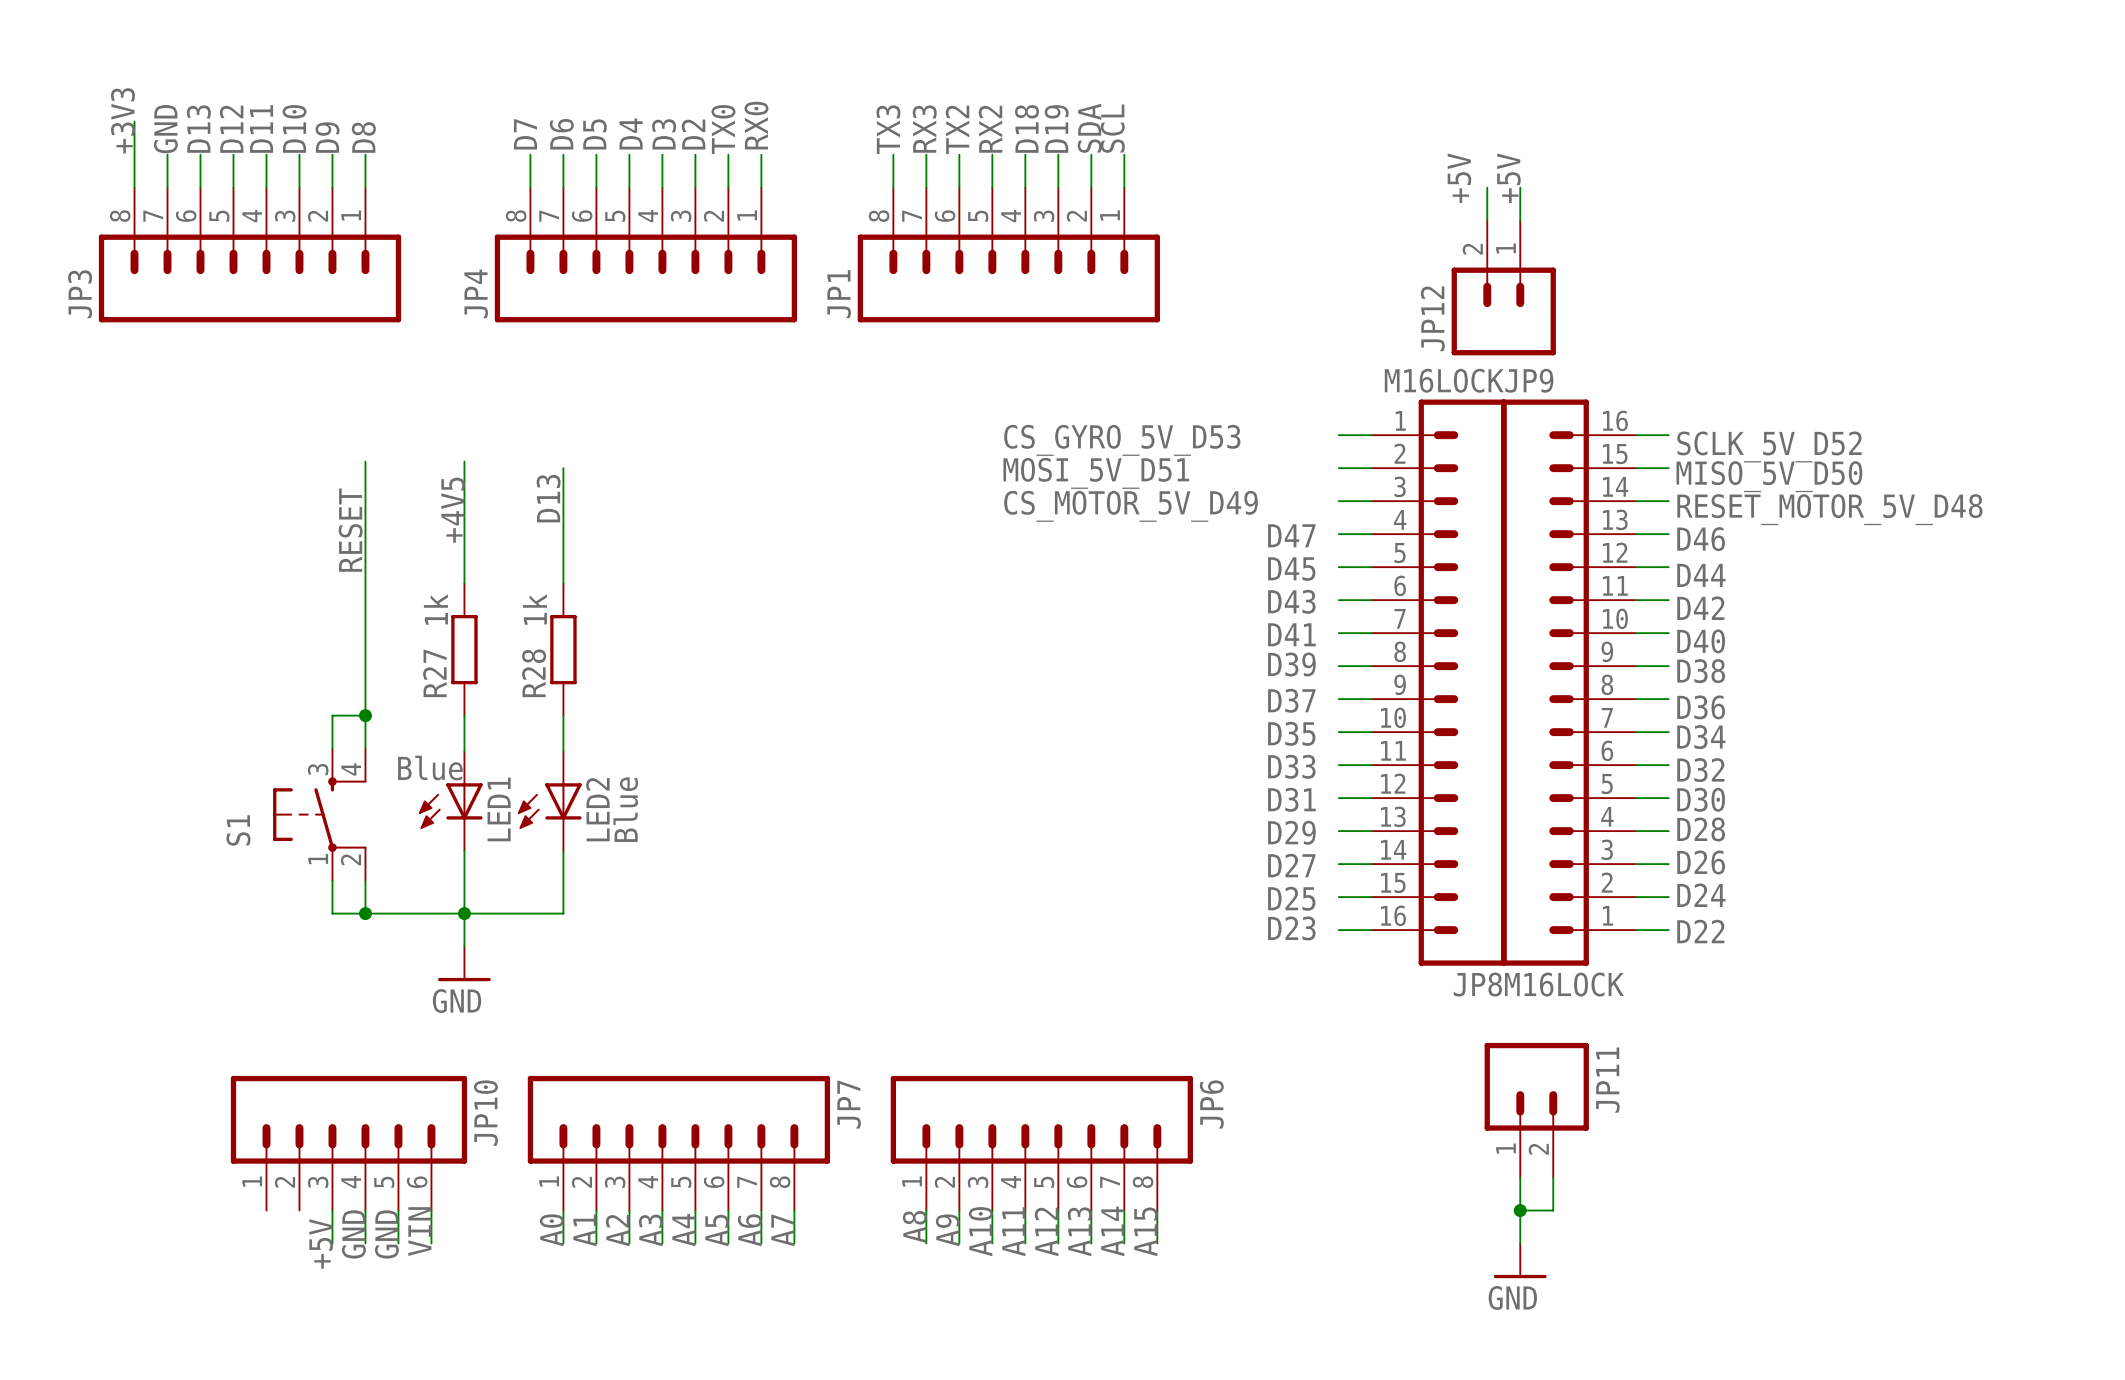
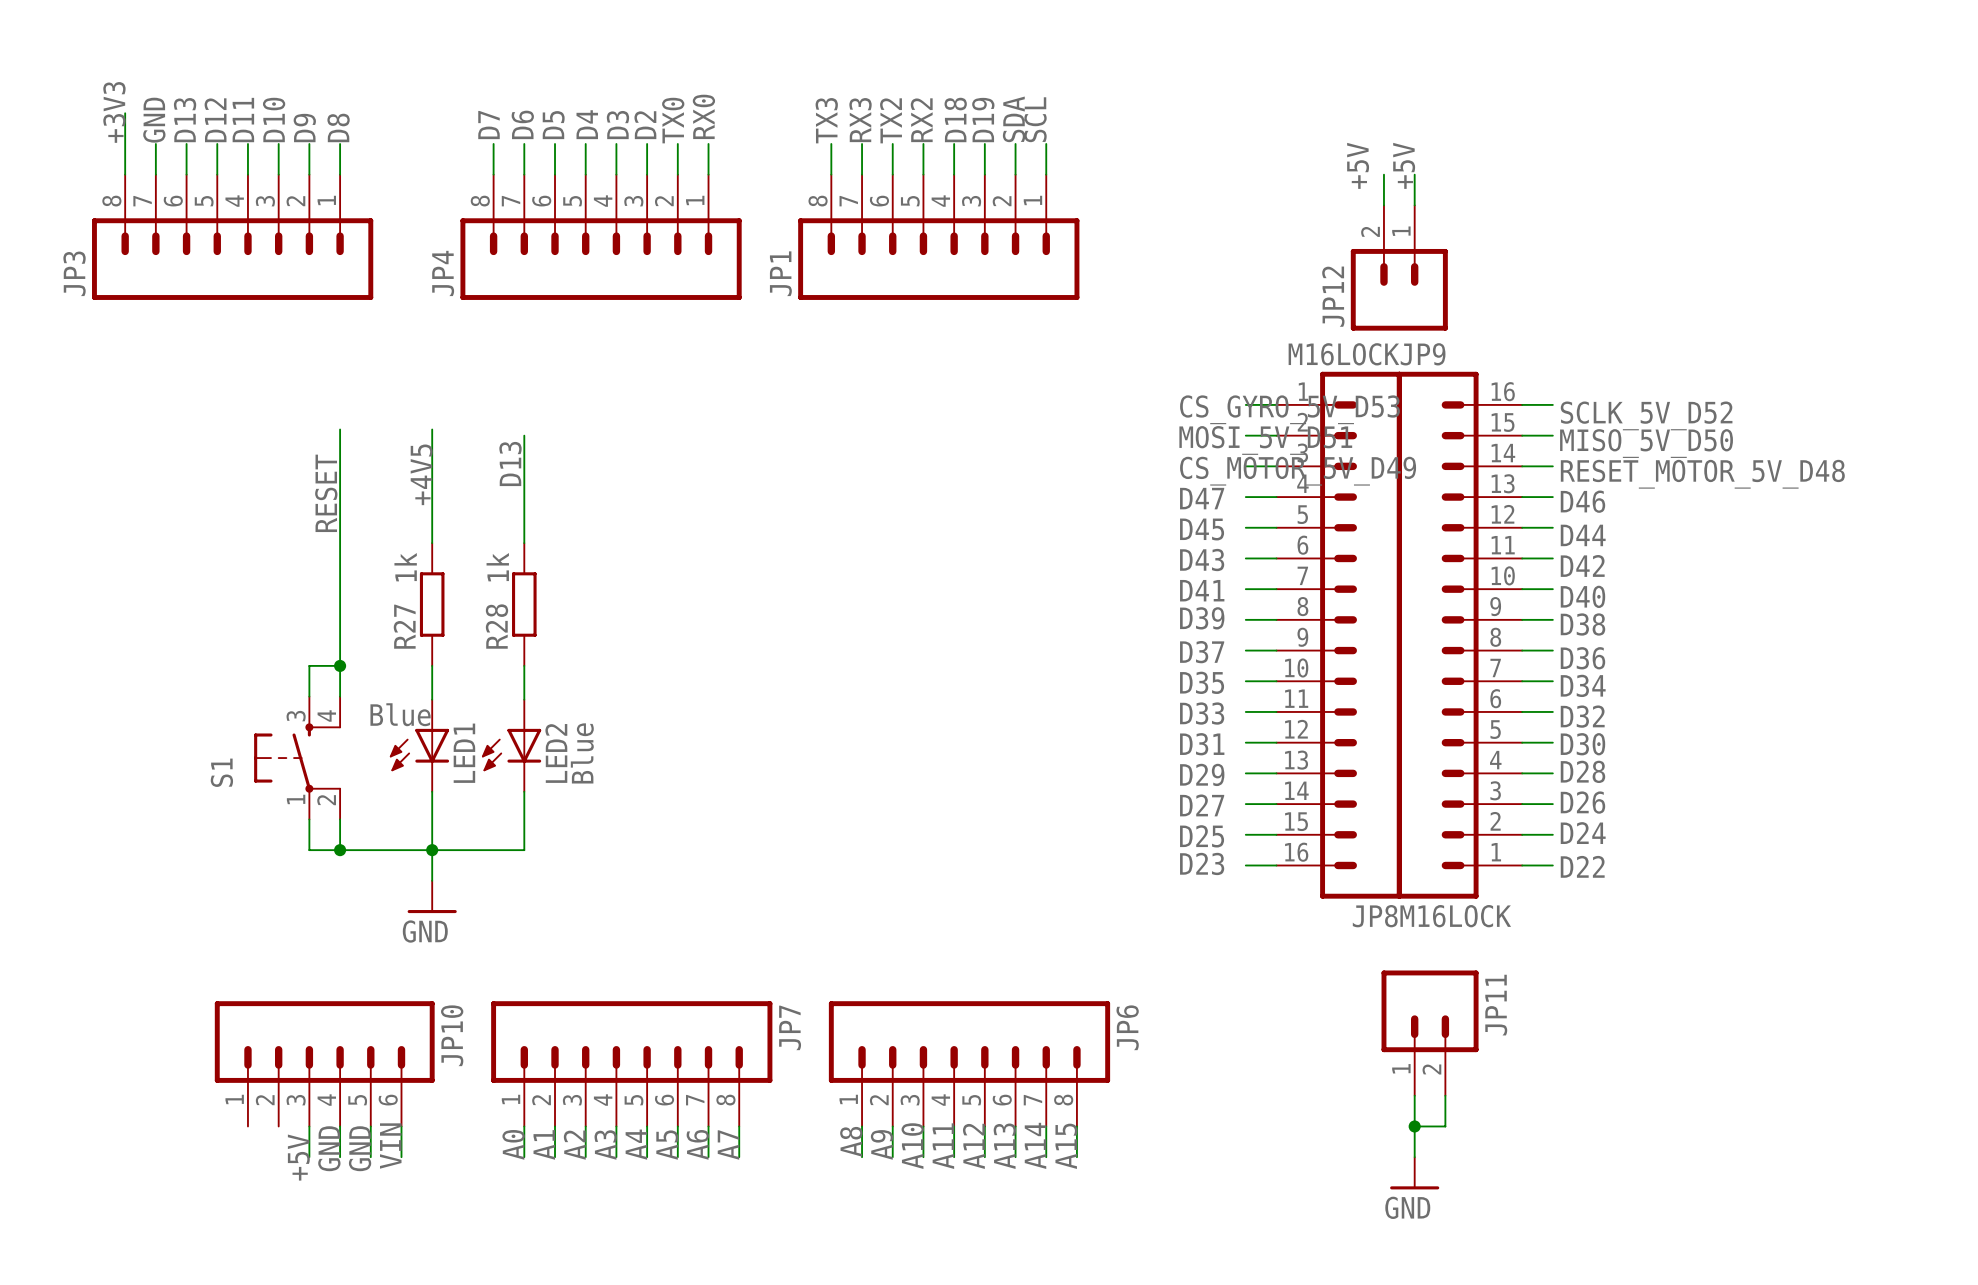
label position: CS_GYRO_5V_D53 (1122, 440) -> CS_GYRO_5V_D53 (1289, 409)
label position: MOSI_5V_D51 (1096, 473) -> MOSI_5V_D51 (1265, 440)
label position: CS_MOTOR_5V_D49 (1130, 506) -> CS_MOTOR_5V_D49 (1298, 471)

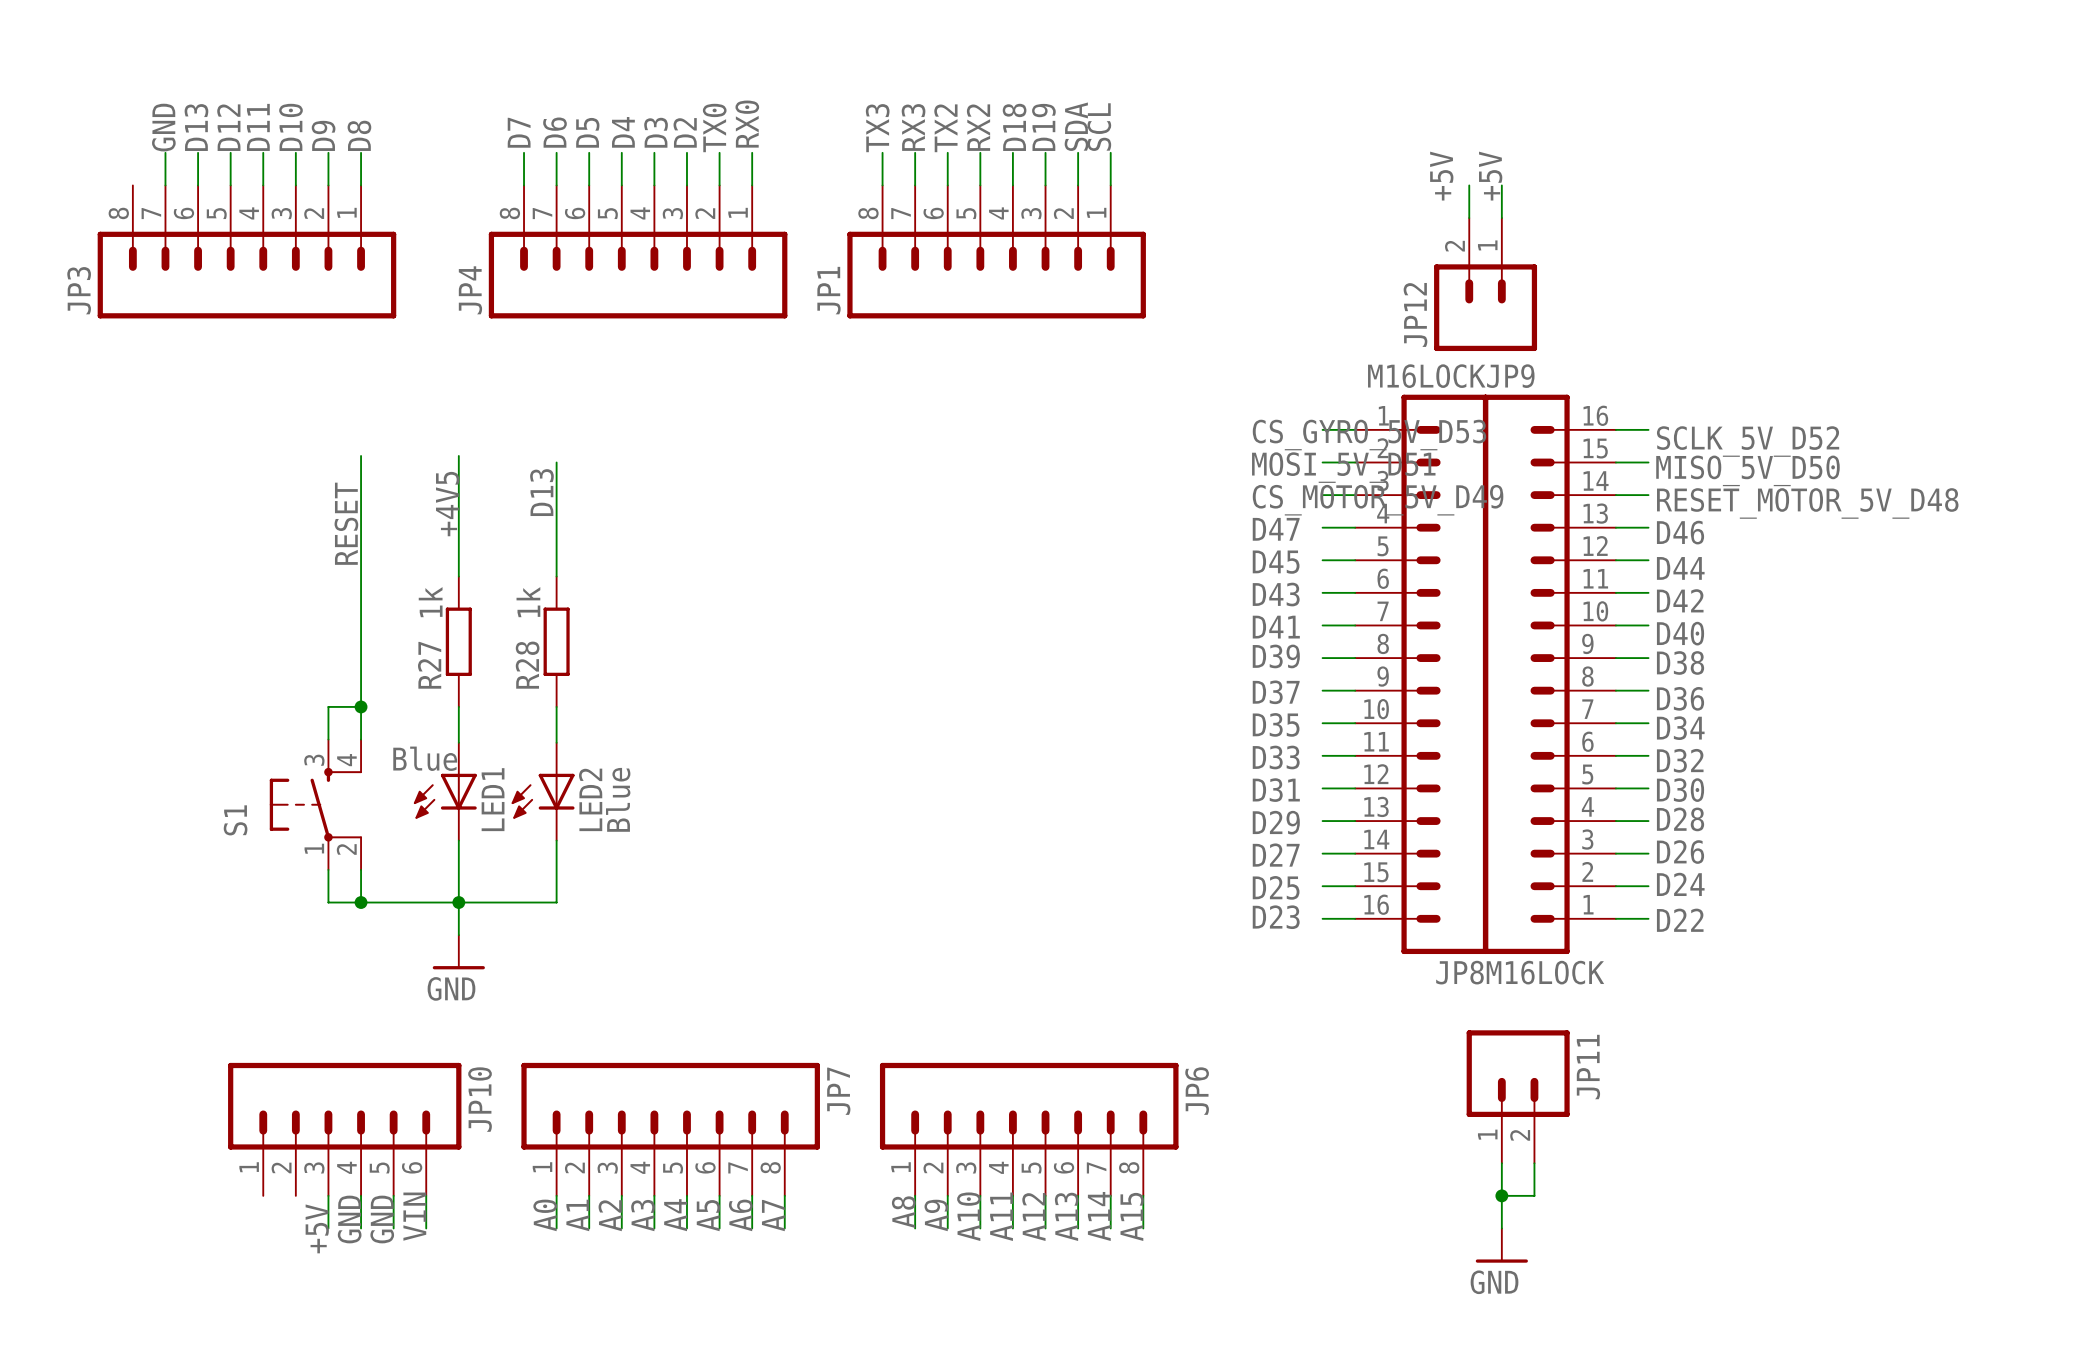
label: +3V3 (114, 112) -> none
wire: (125, 113) (125, 174) -> none

